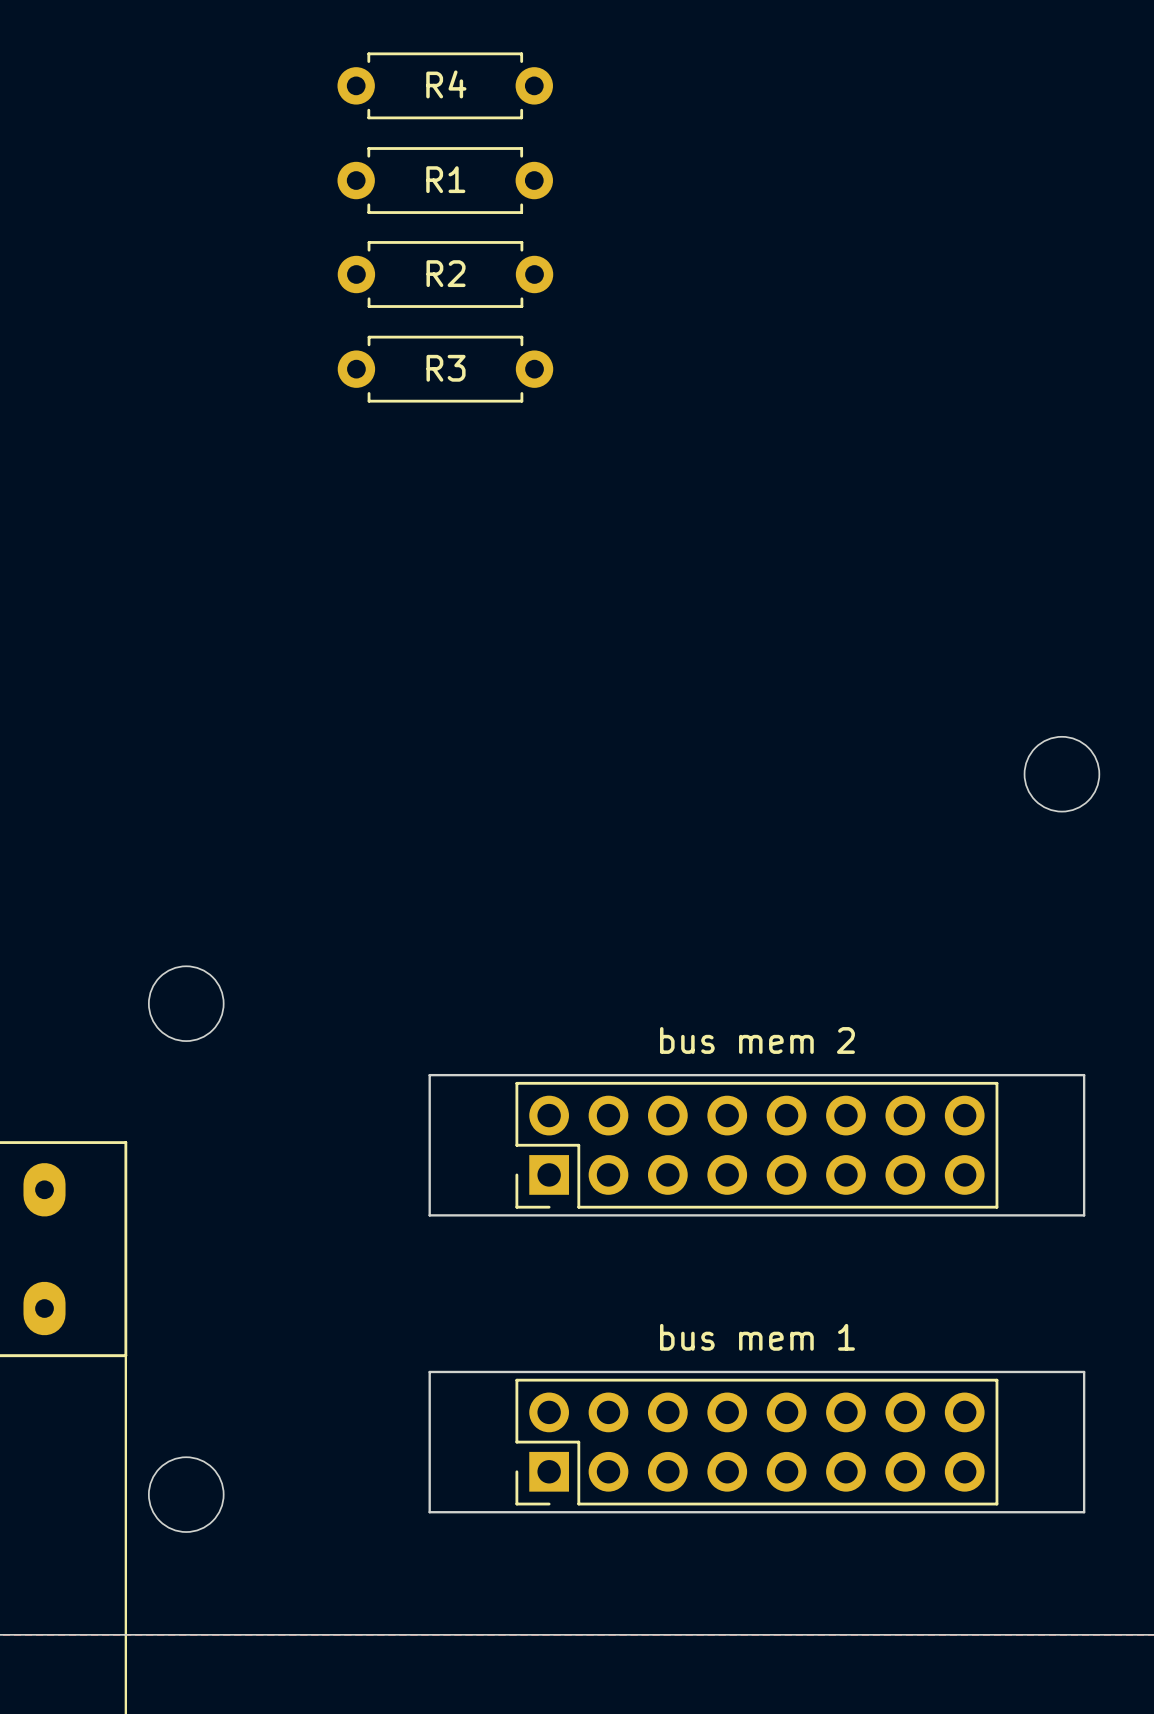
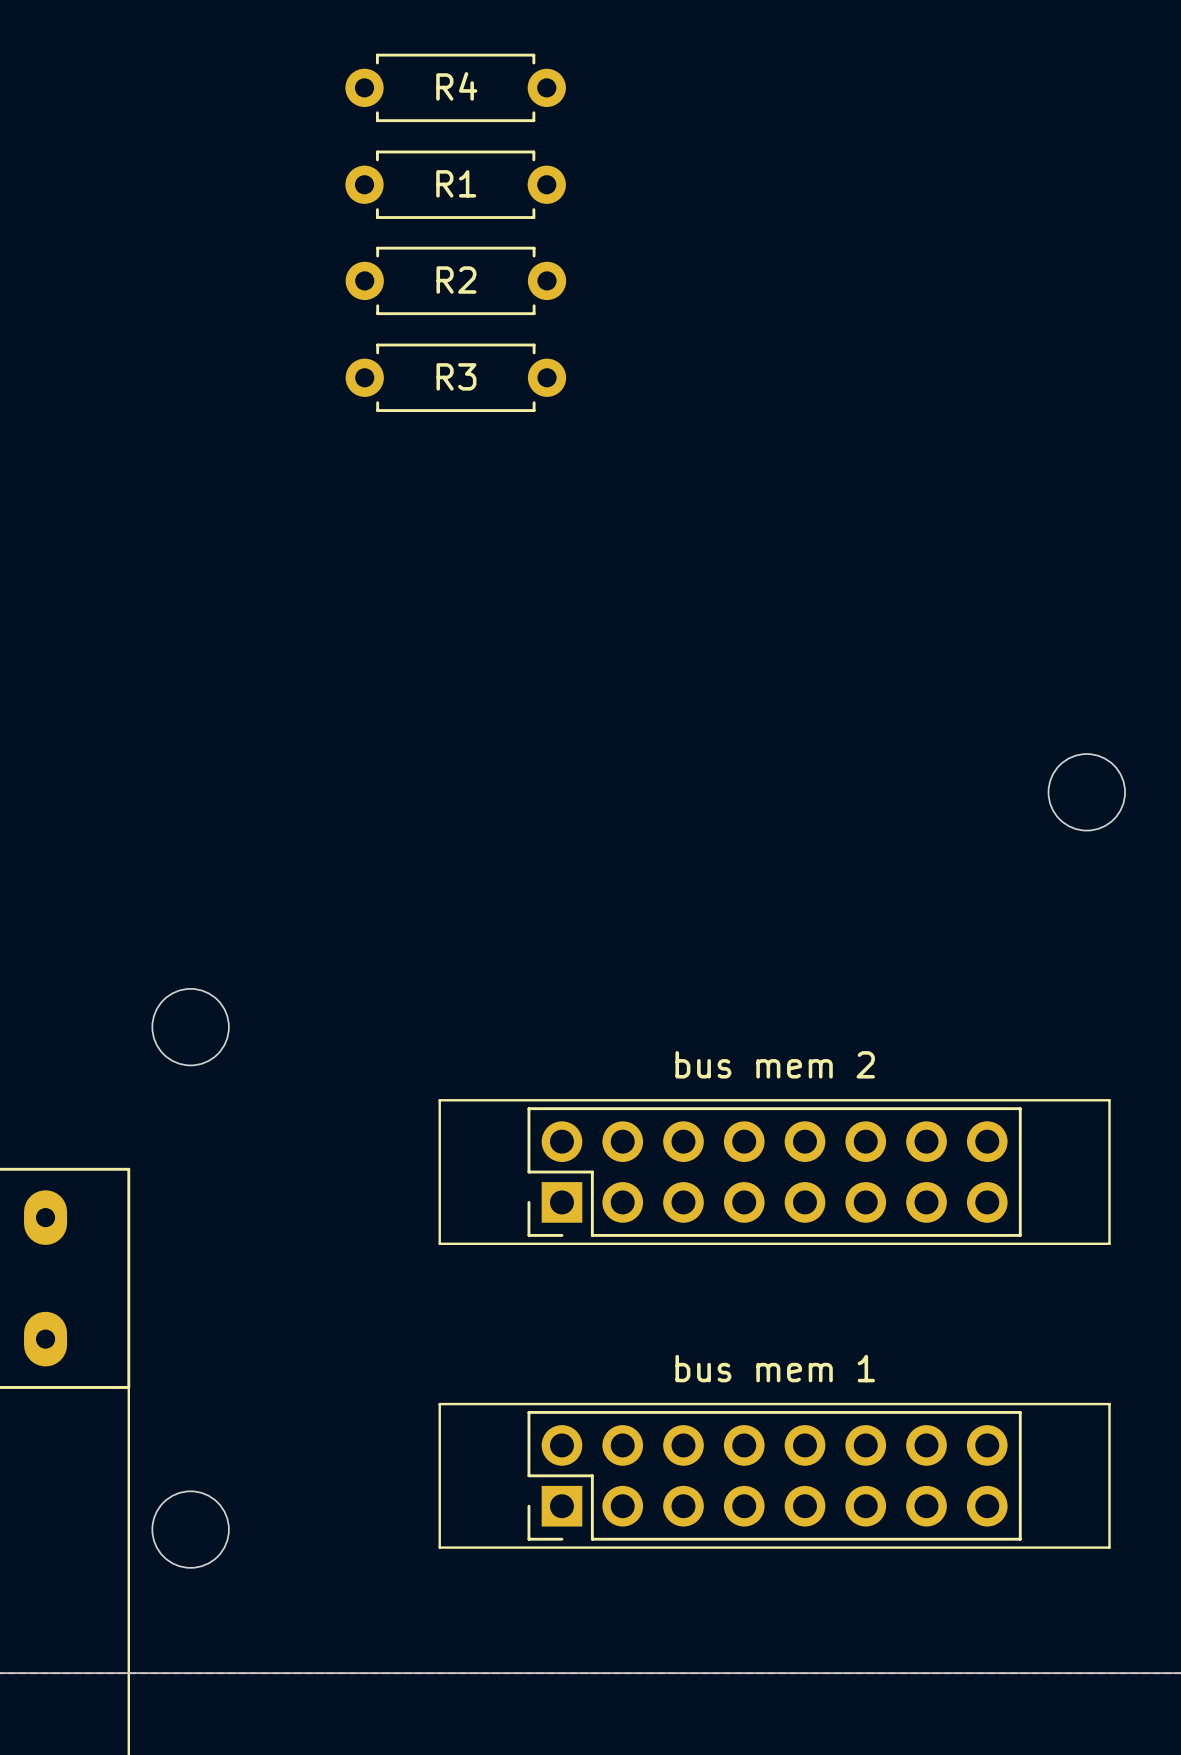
line: none -> (439, 1100) (1109, 1100) (1109, 1243) (439, 1243) (439, 1100)
board edge: (429, 1075) (1084, 1075) (1084, 1215) (429, 1215) (429, 1075) -> none
line: none -> (439, 1404) (439, 1547) (1109, 1547) (1109, 1404) (439, 1404)
board edge: (429, 1371) (429, 1512) (1084, 1512) (1084, 1371) (429, 1371) -> none

